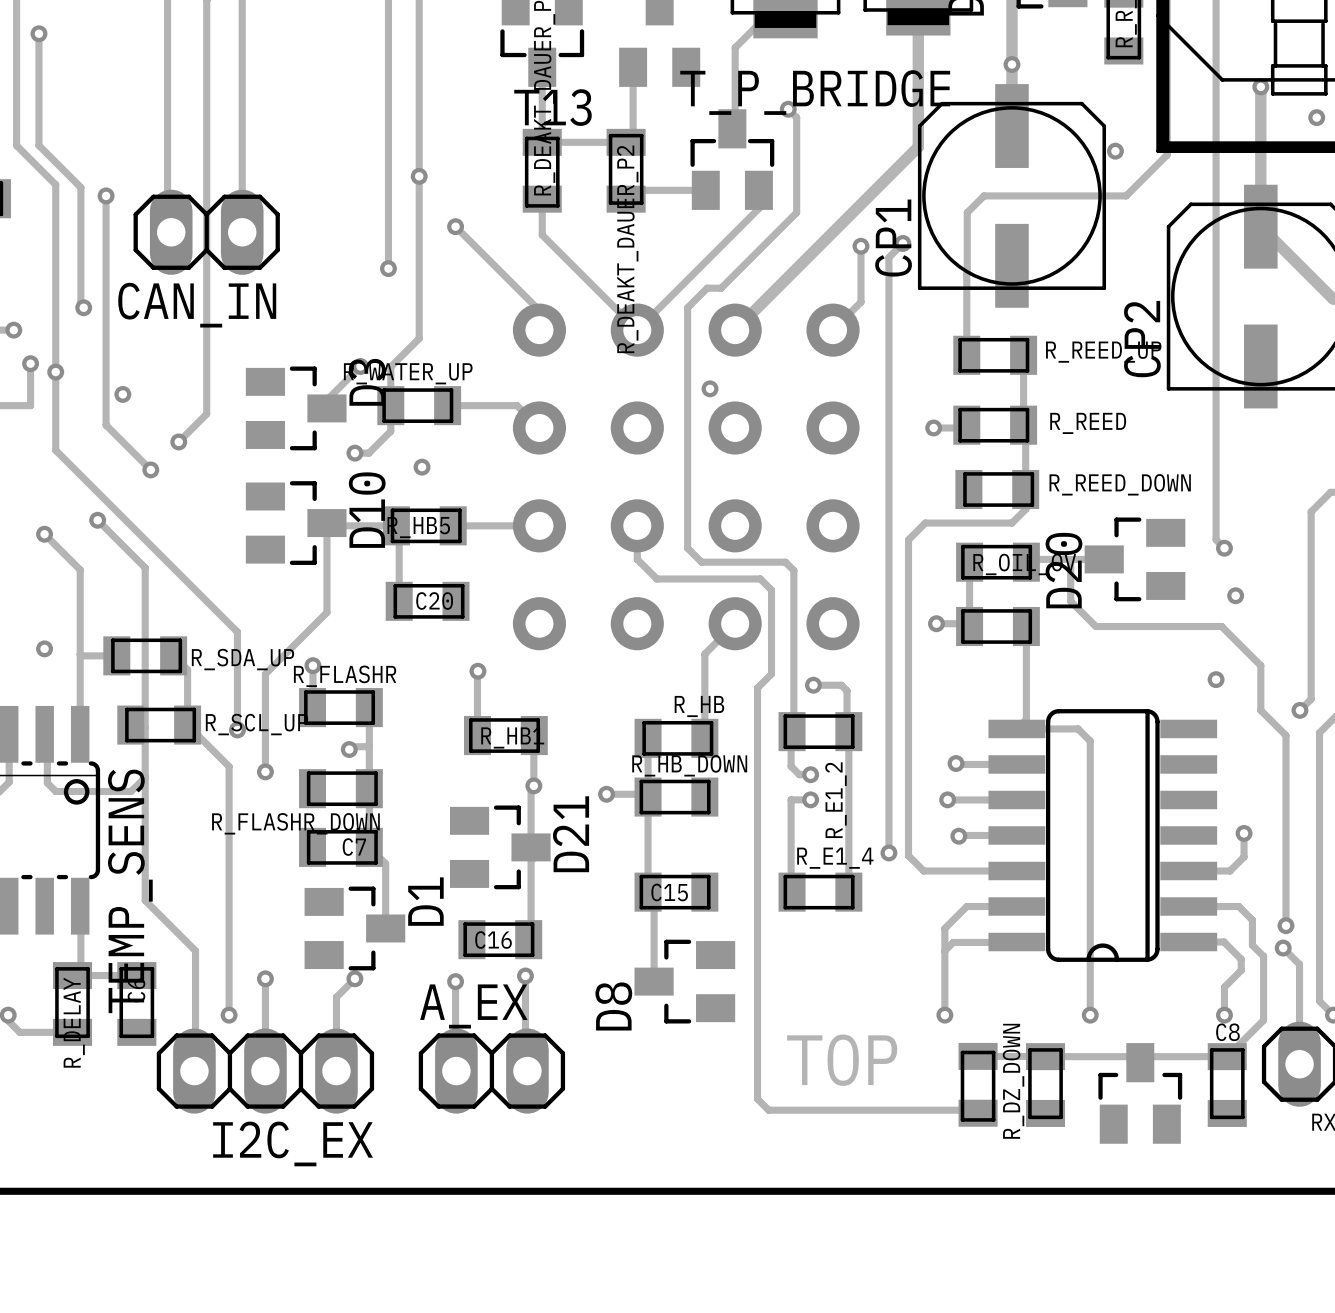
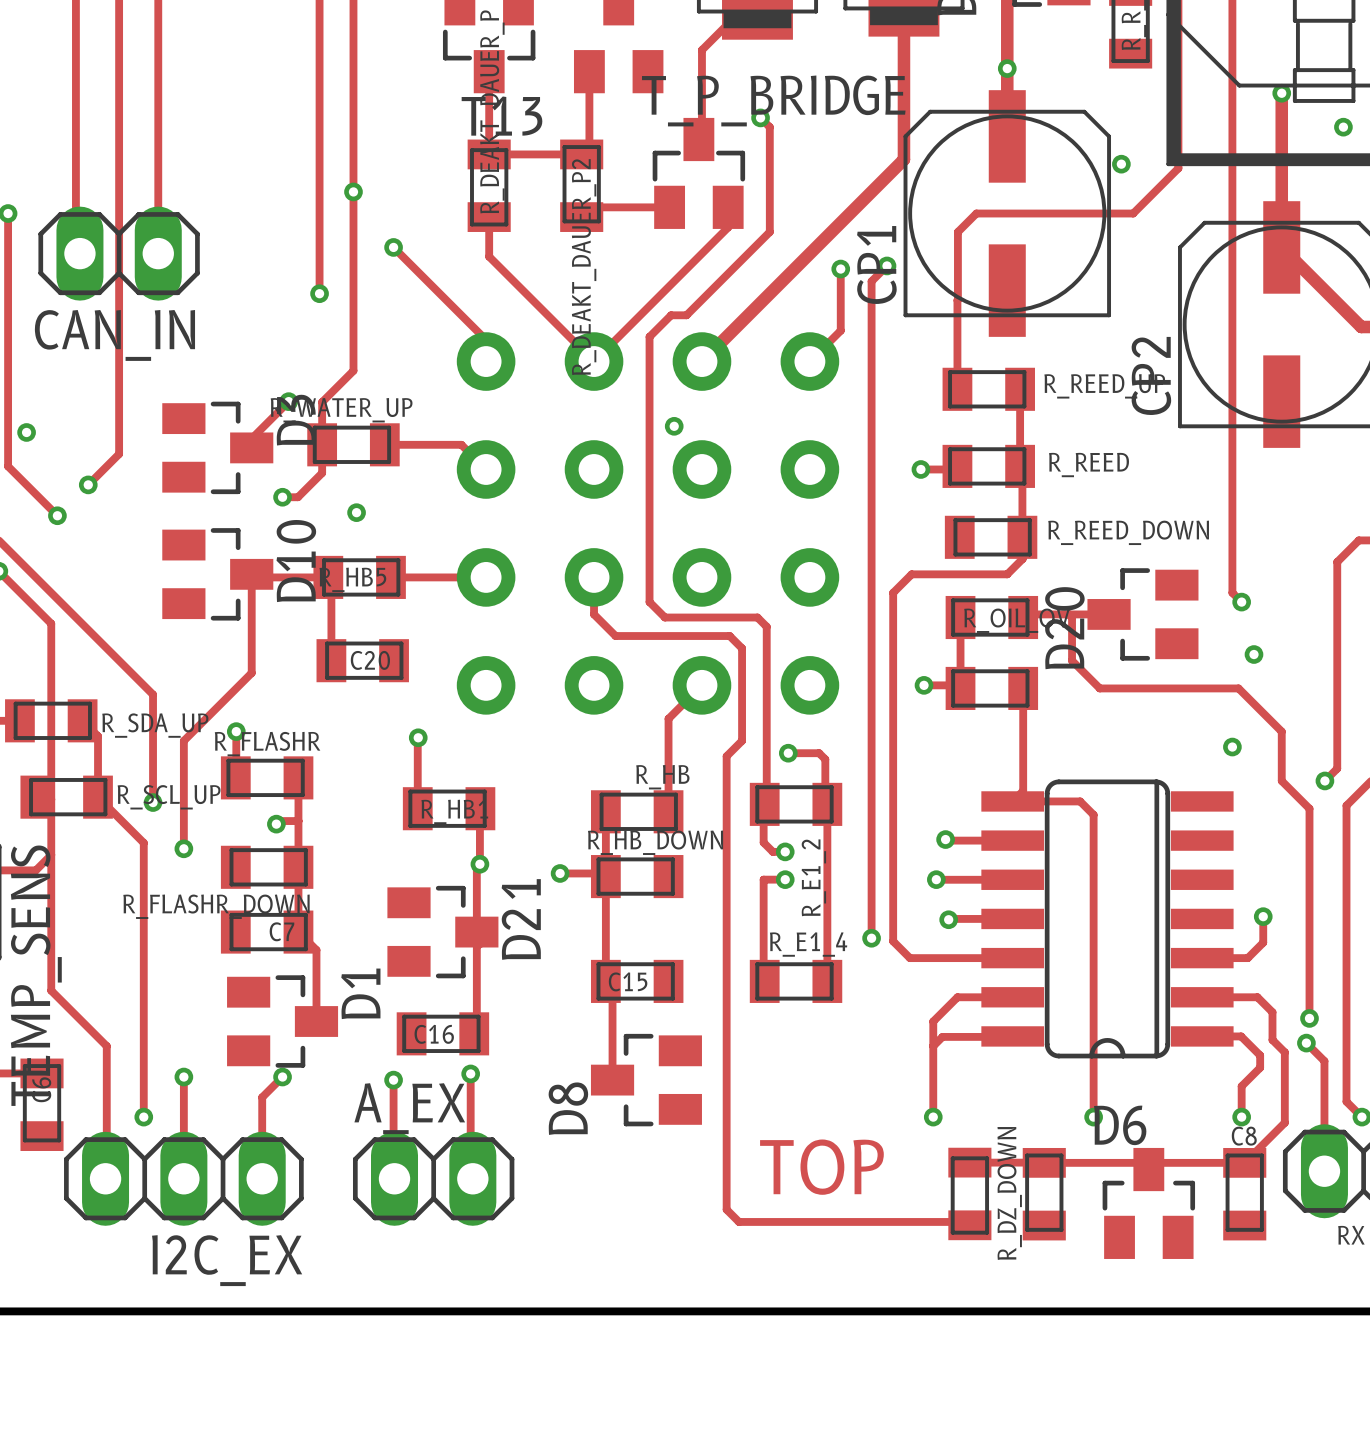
D6 name: none -> D6 (1120, 1125)

